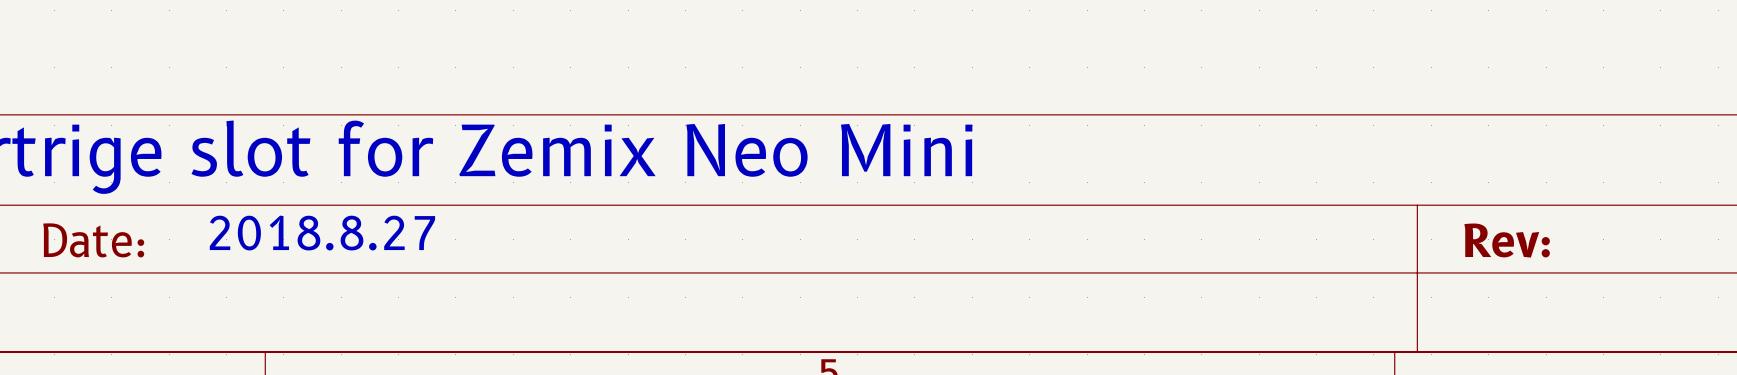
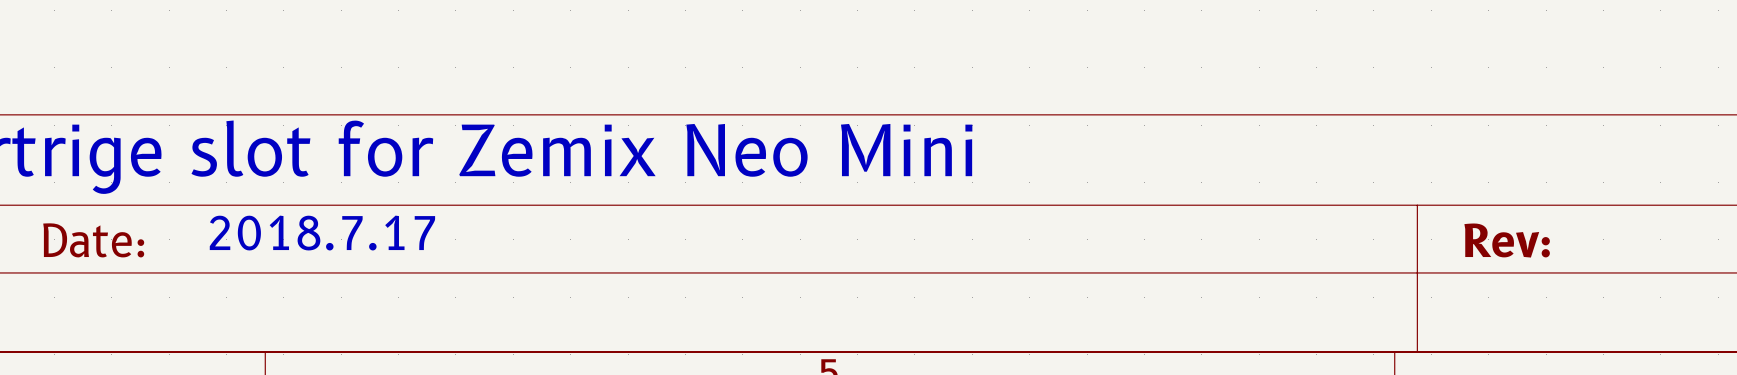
text: 2018.8.27 (322, 233) -> 2018.7.17 (322, 233)

